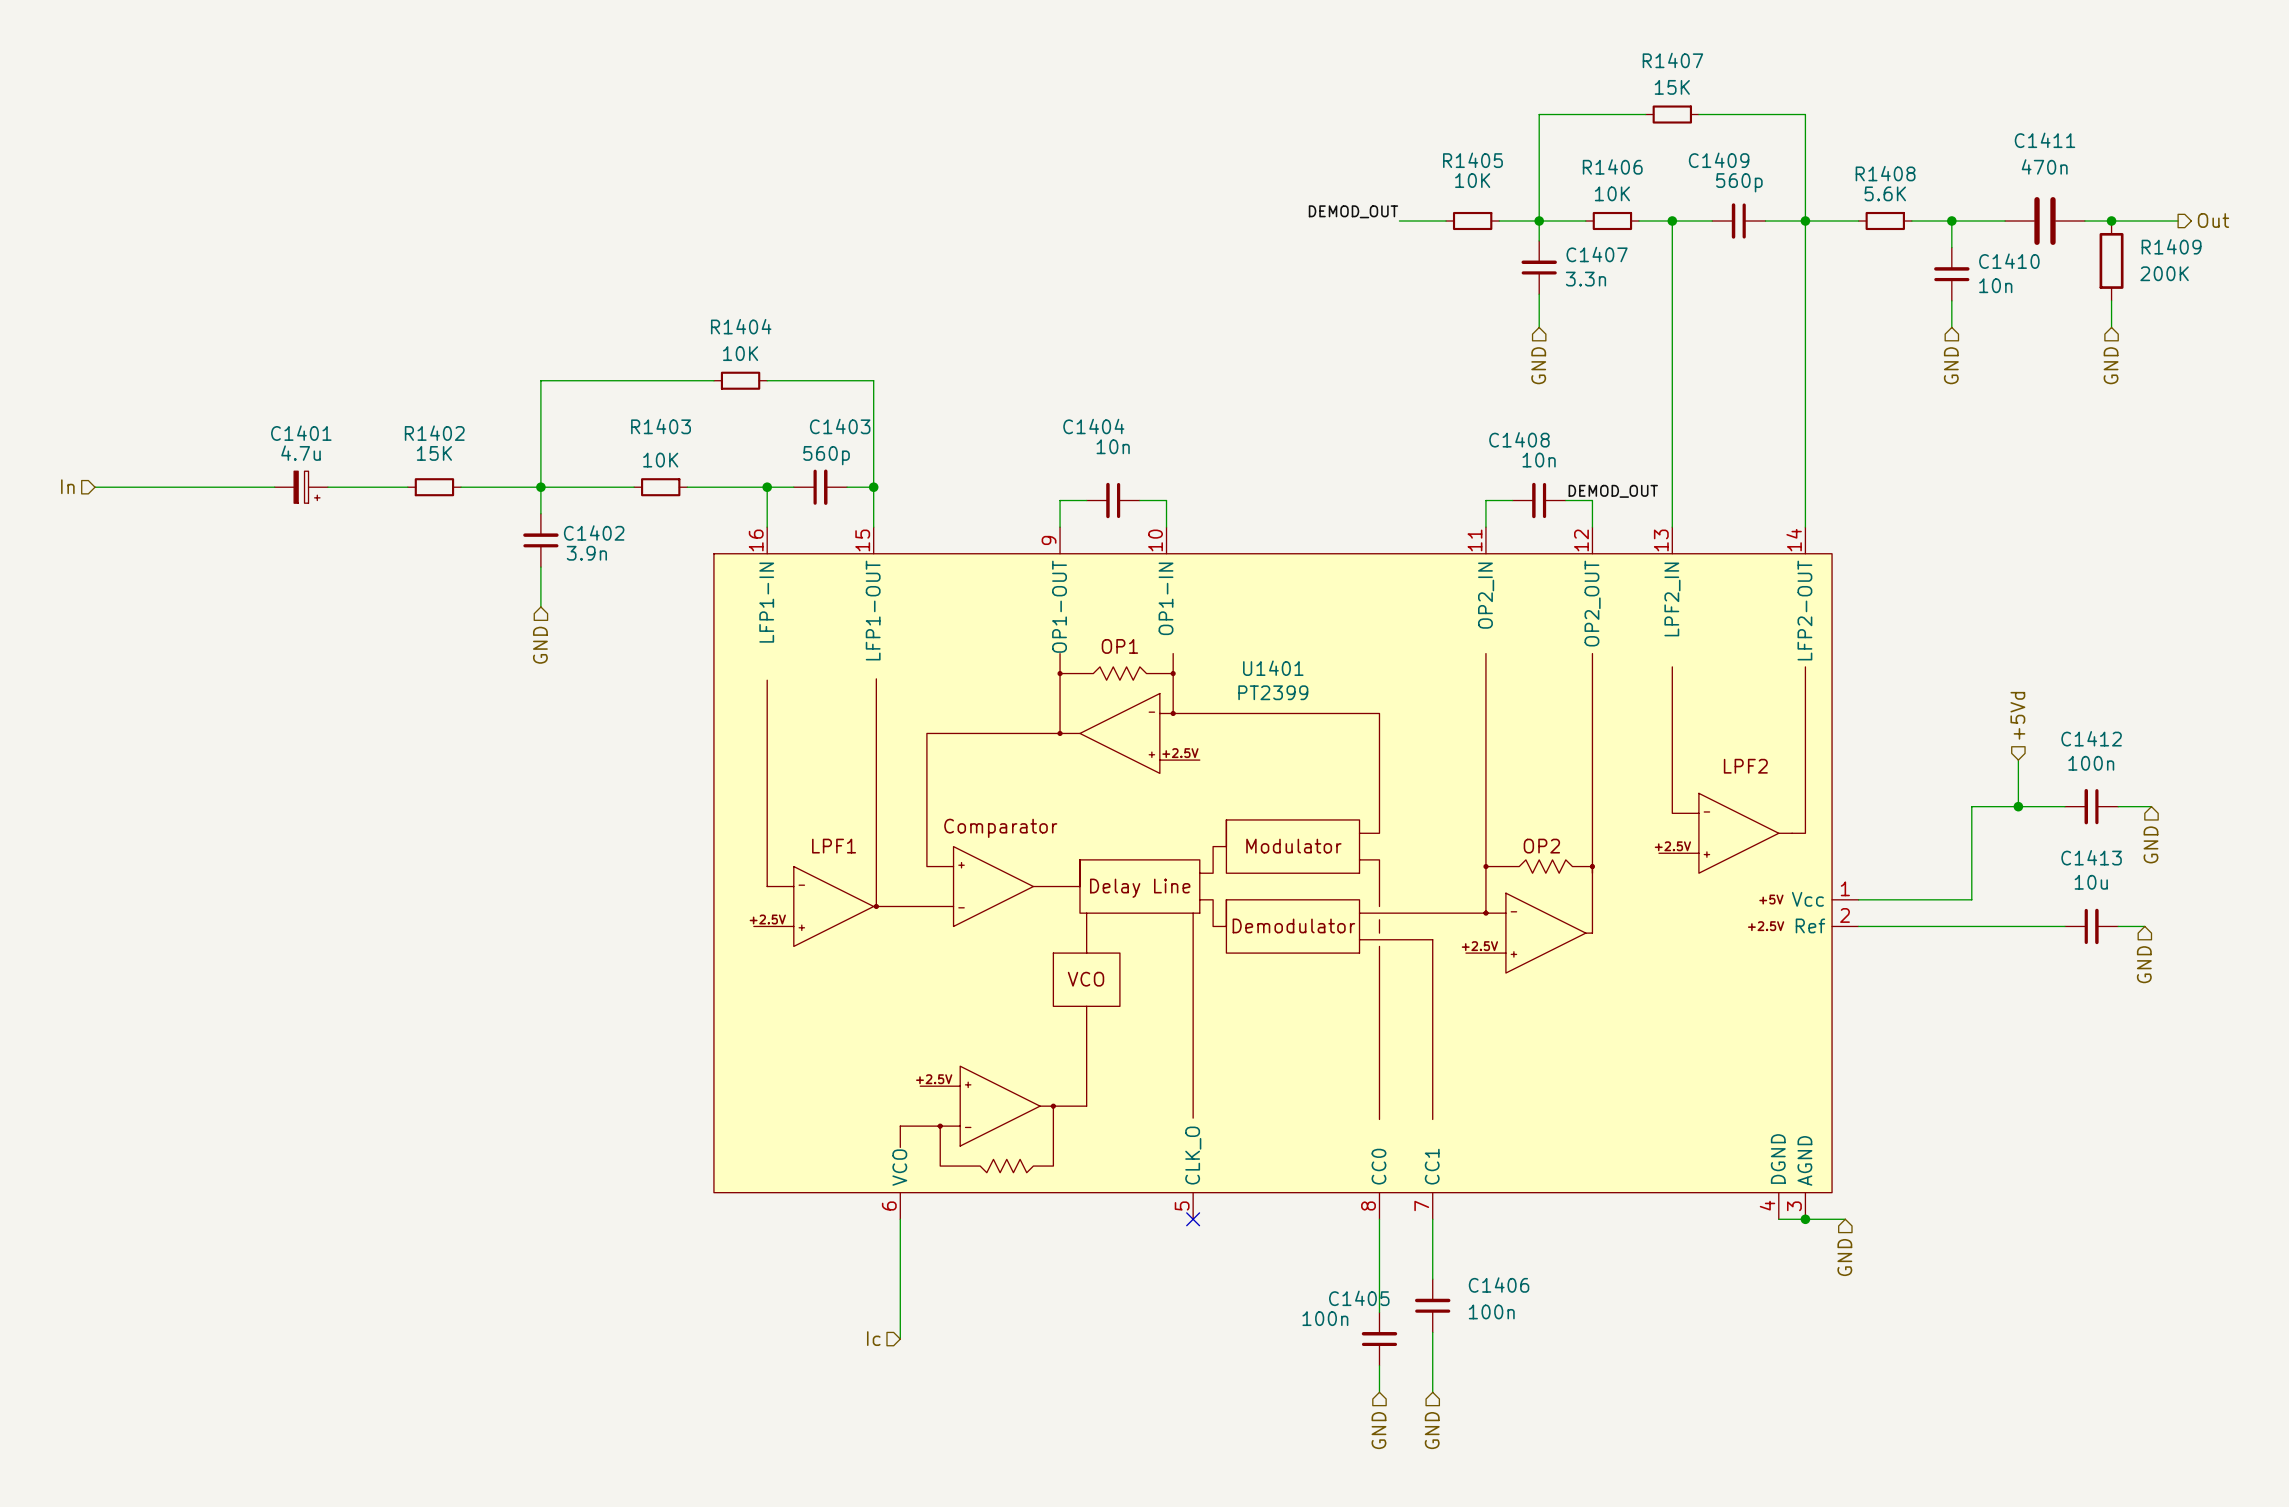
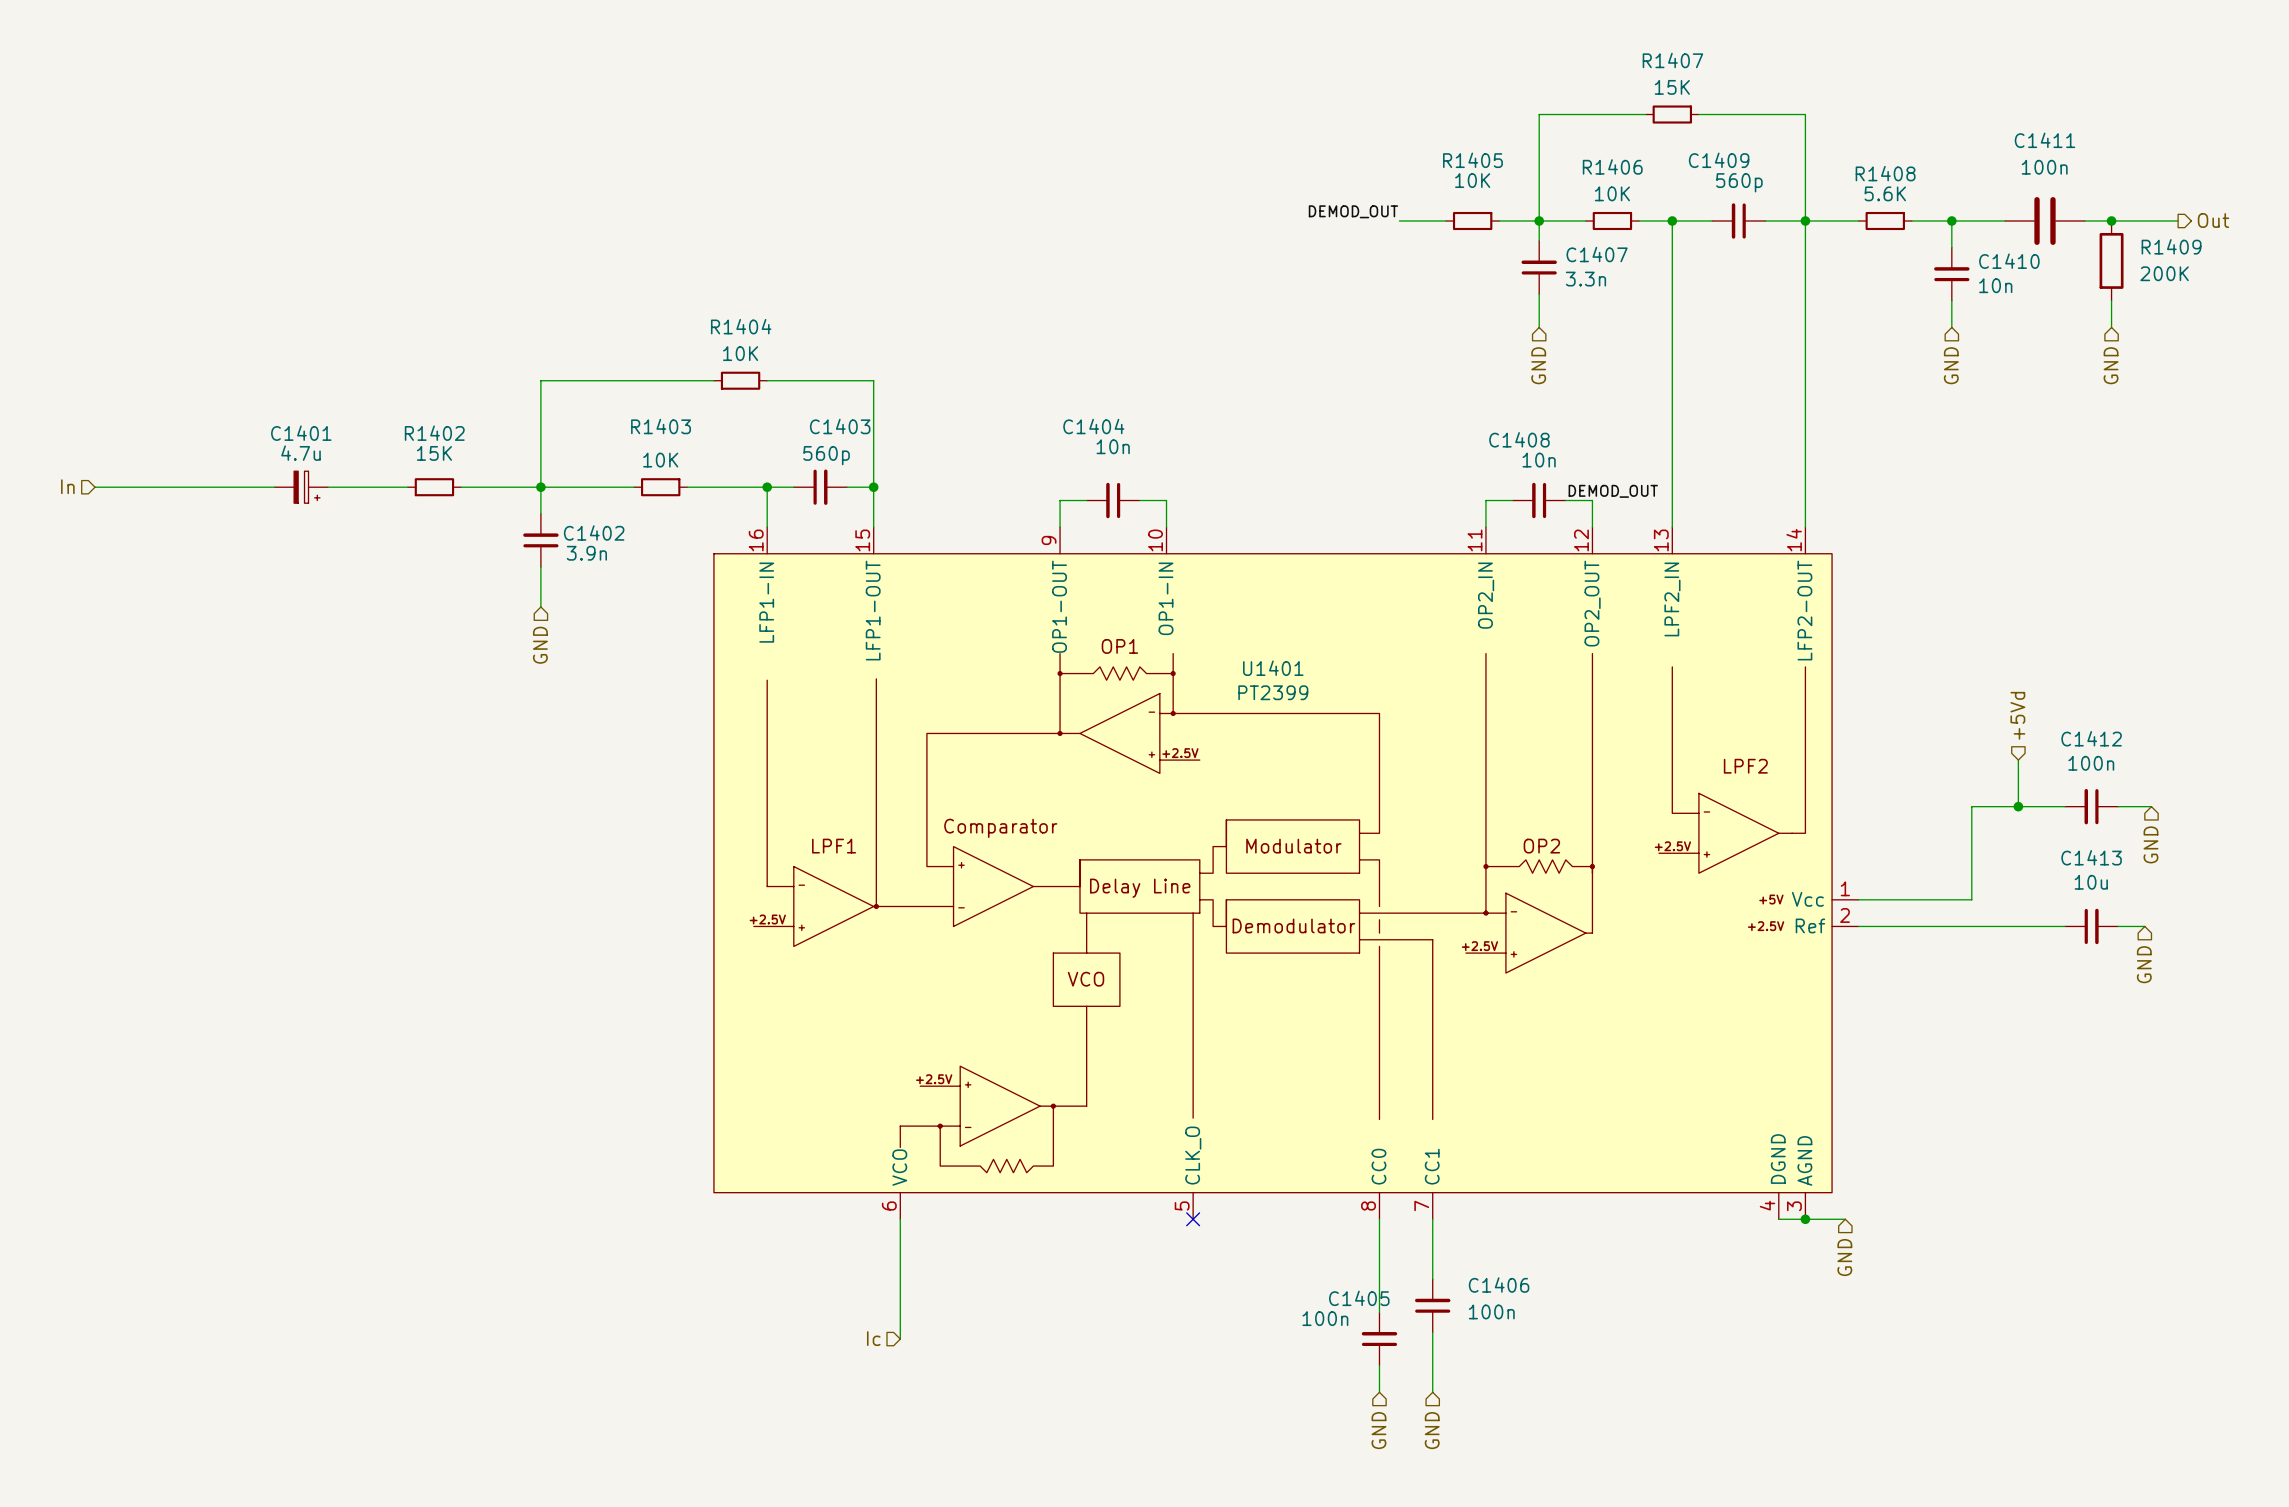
C1411 value: 470n (2044, 166) -> 100n (2044, 167)

